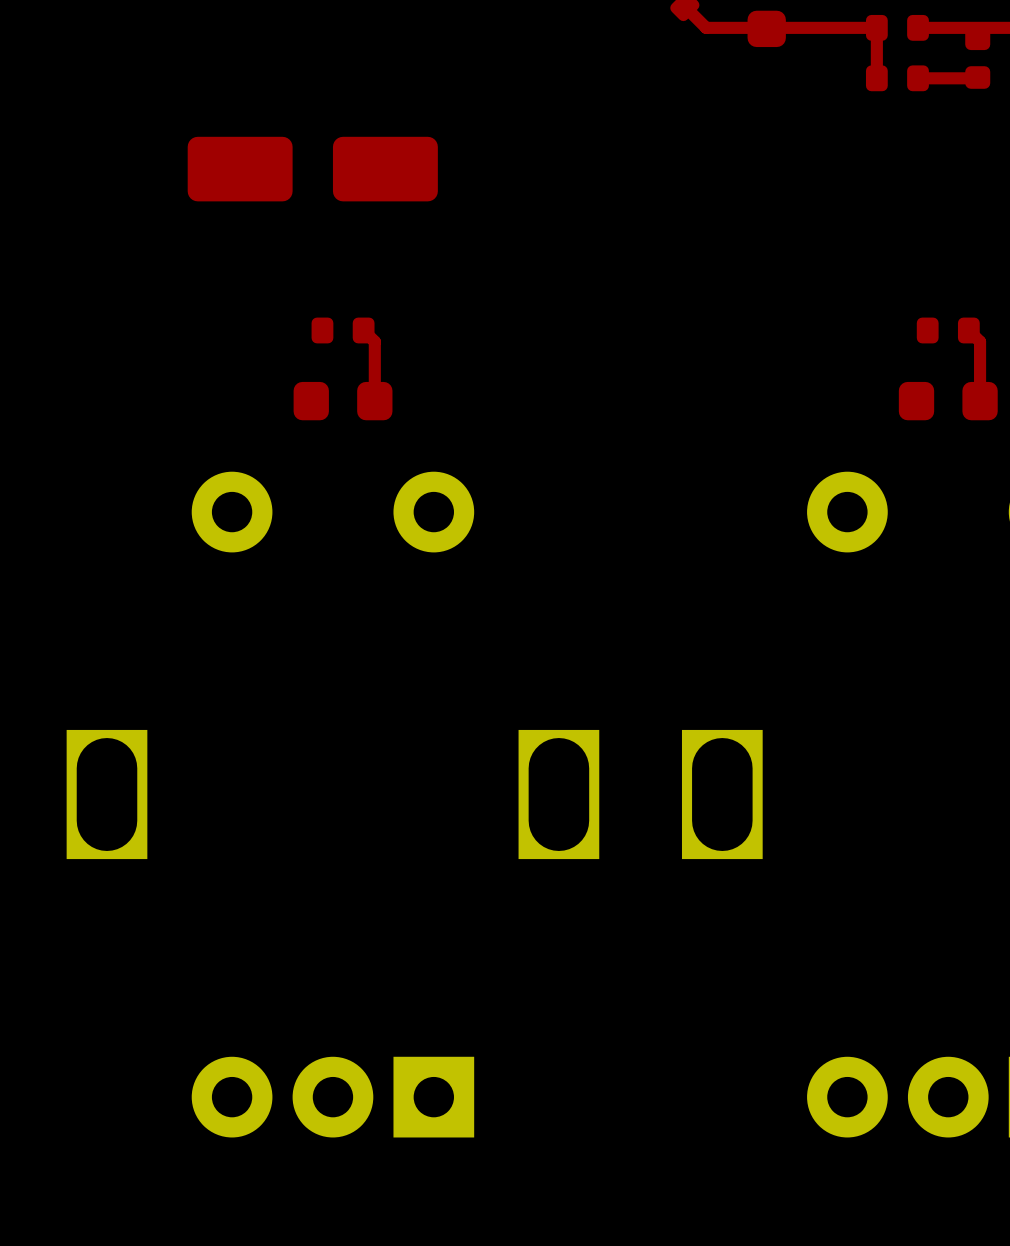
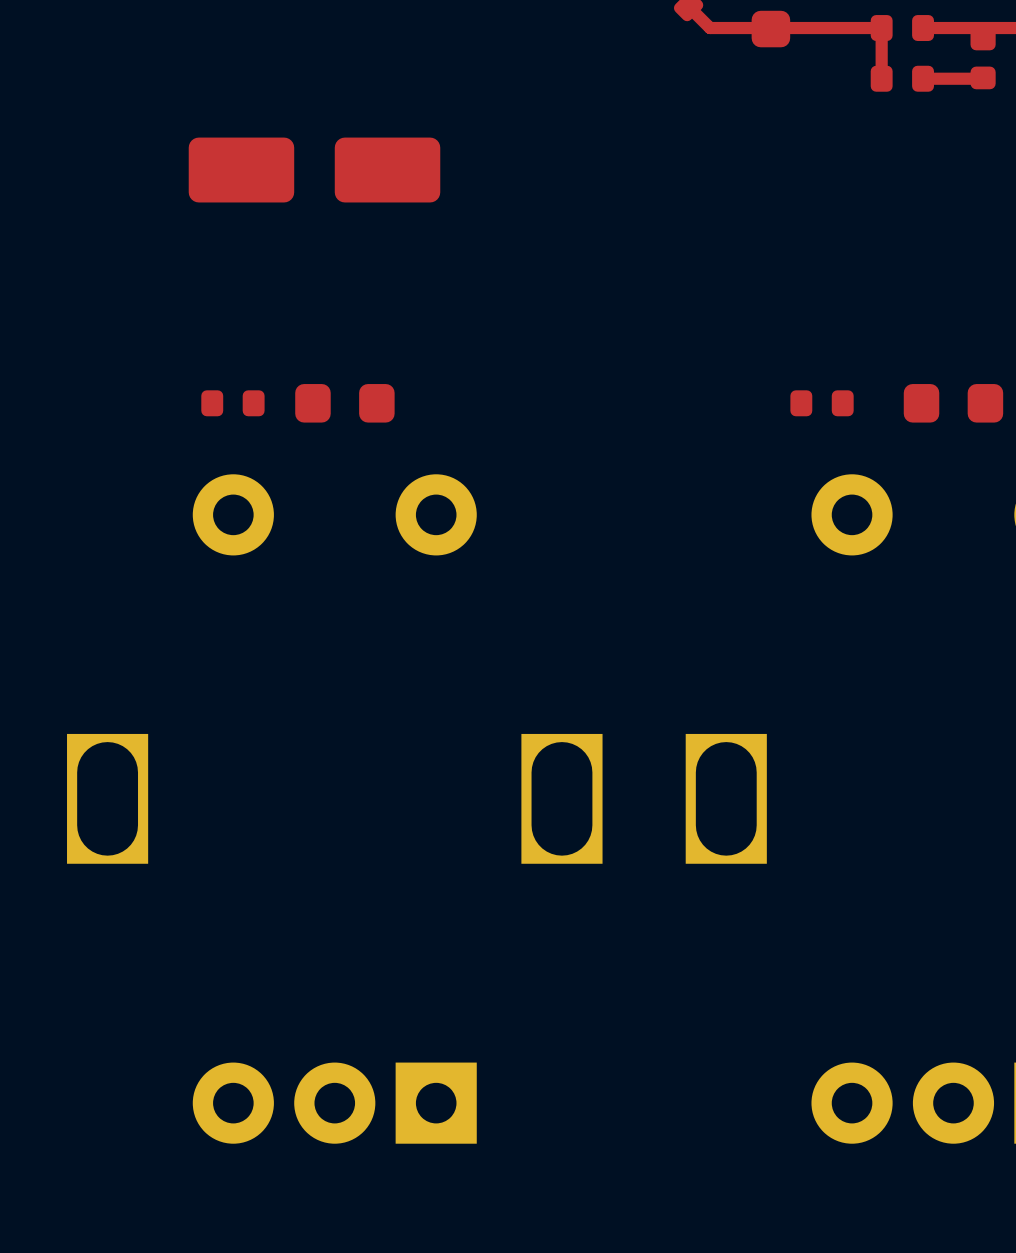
part position: (343, 330) -> (232, 403)
top track: (363, 330) (374, 341) (374, 401) -> none
part position: (948, 330) -> (822, 403)
top track: (968, 330) (980, 341) (980, 401) -> none

